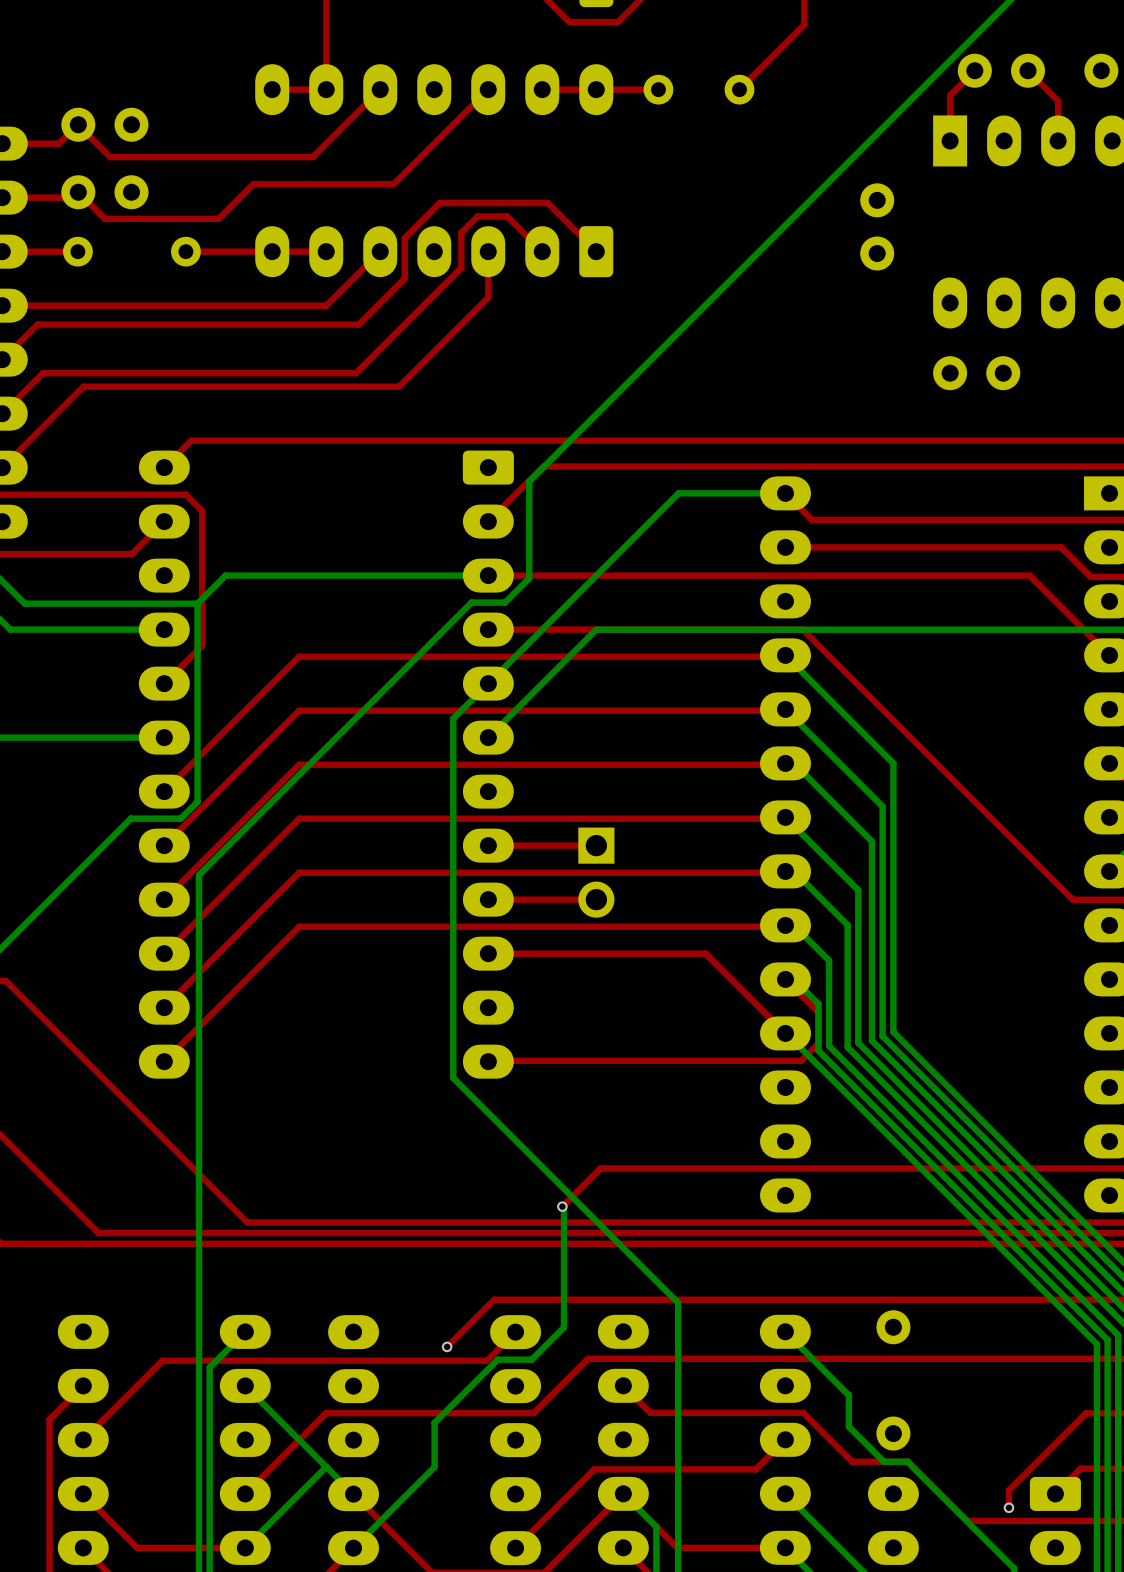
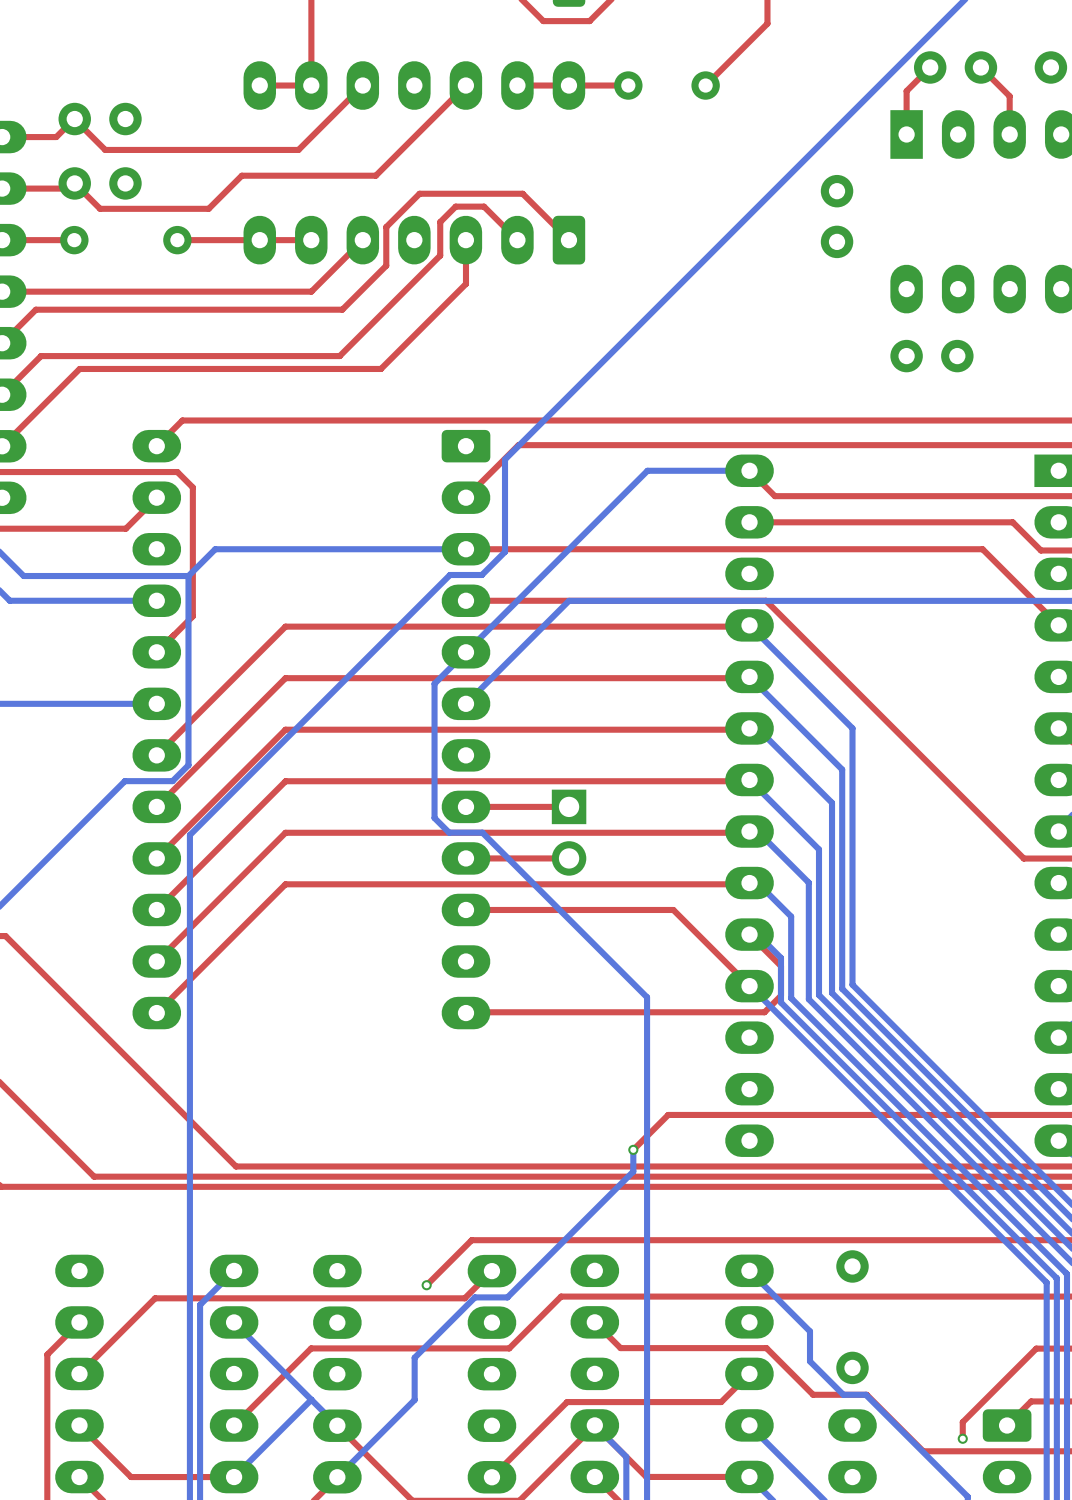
bottom track: (455, 716) (453, 718) (453, 1077) (678, 1302) -> (434, 683) (434, 818) (449, 832) (482, 832) (647, 997) (647, 1243)
top track: (700, 1168) (600, 1168) (562, 1206) -> (668, 1114) (633, 1149)
bottom track: (562, 1206) (563, 1208) (563, 1327) -> (633, 1149) (633, 1171) (538, 1266)
via position: (562, 1206) -> (633, 1149)

